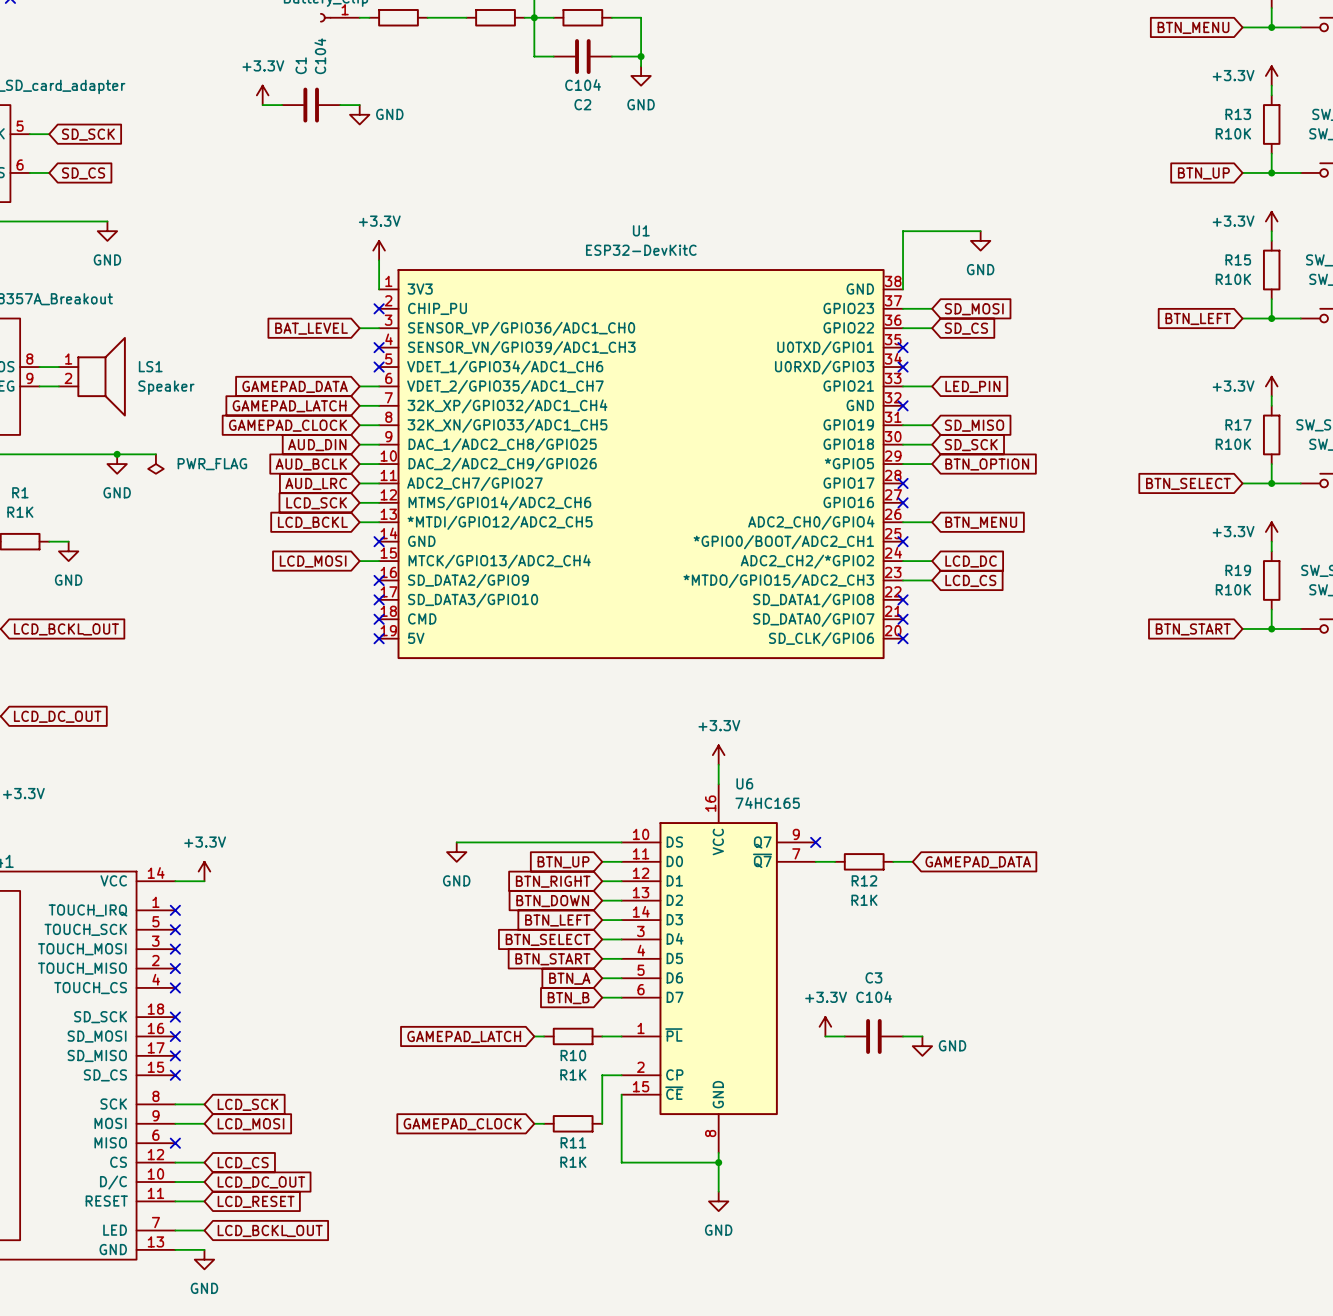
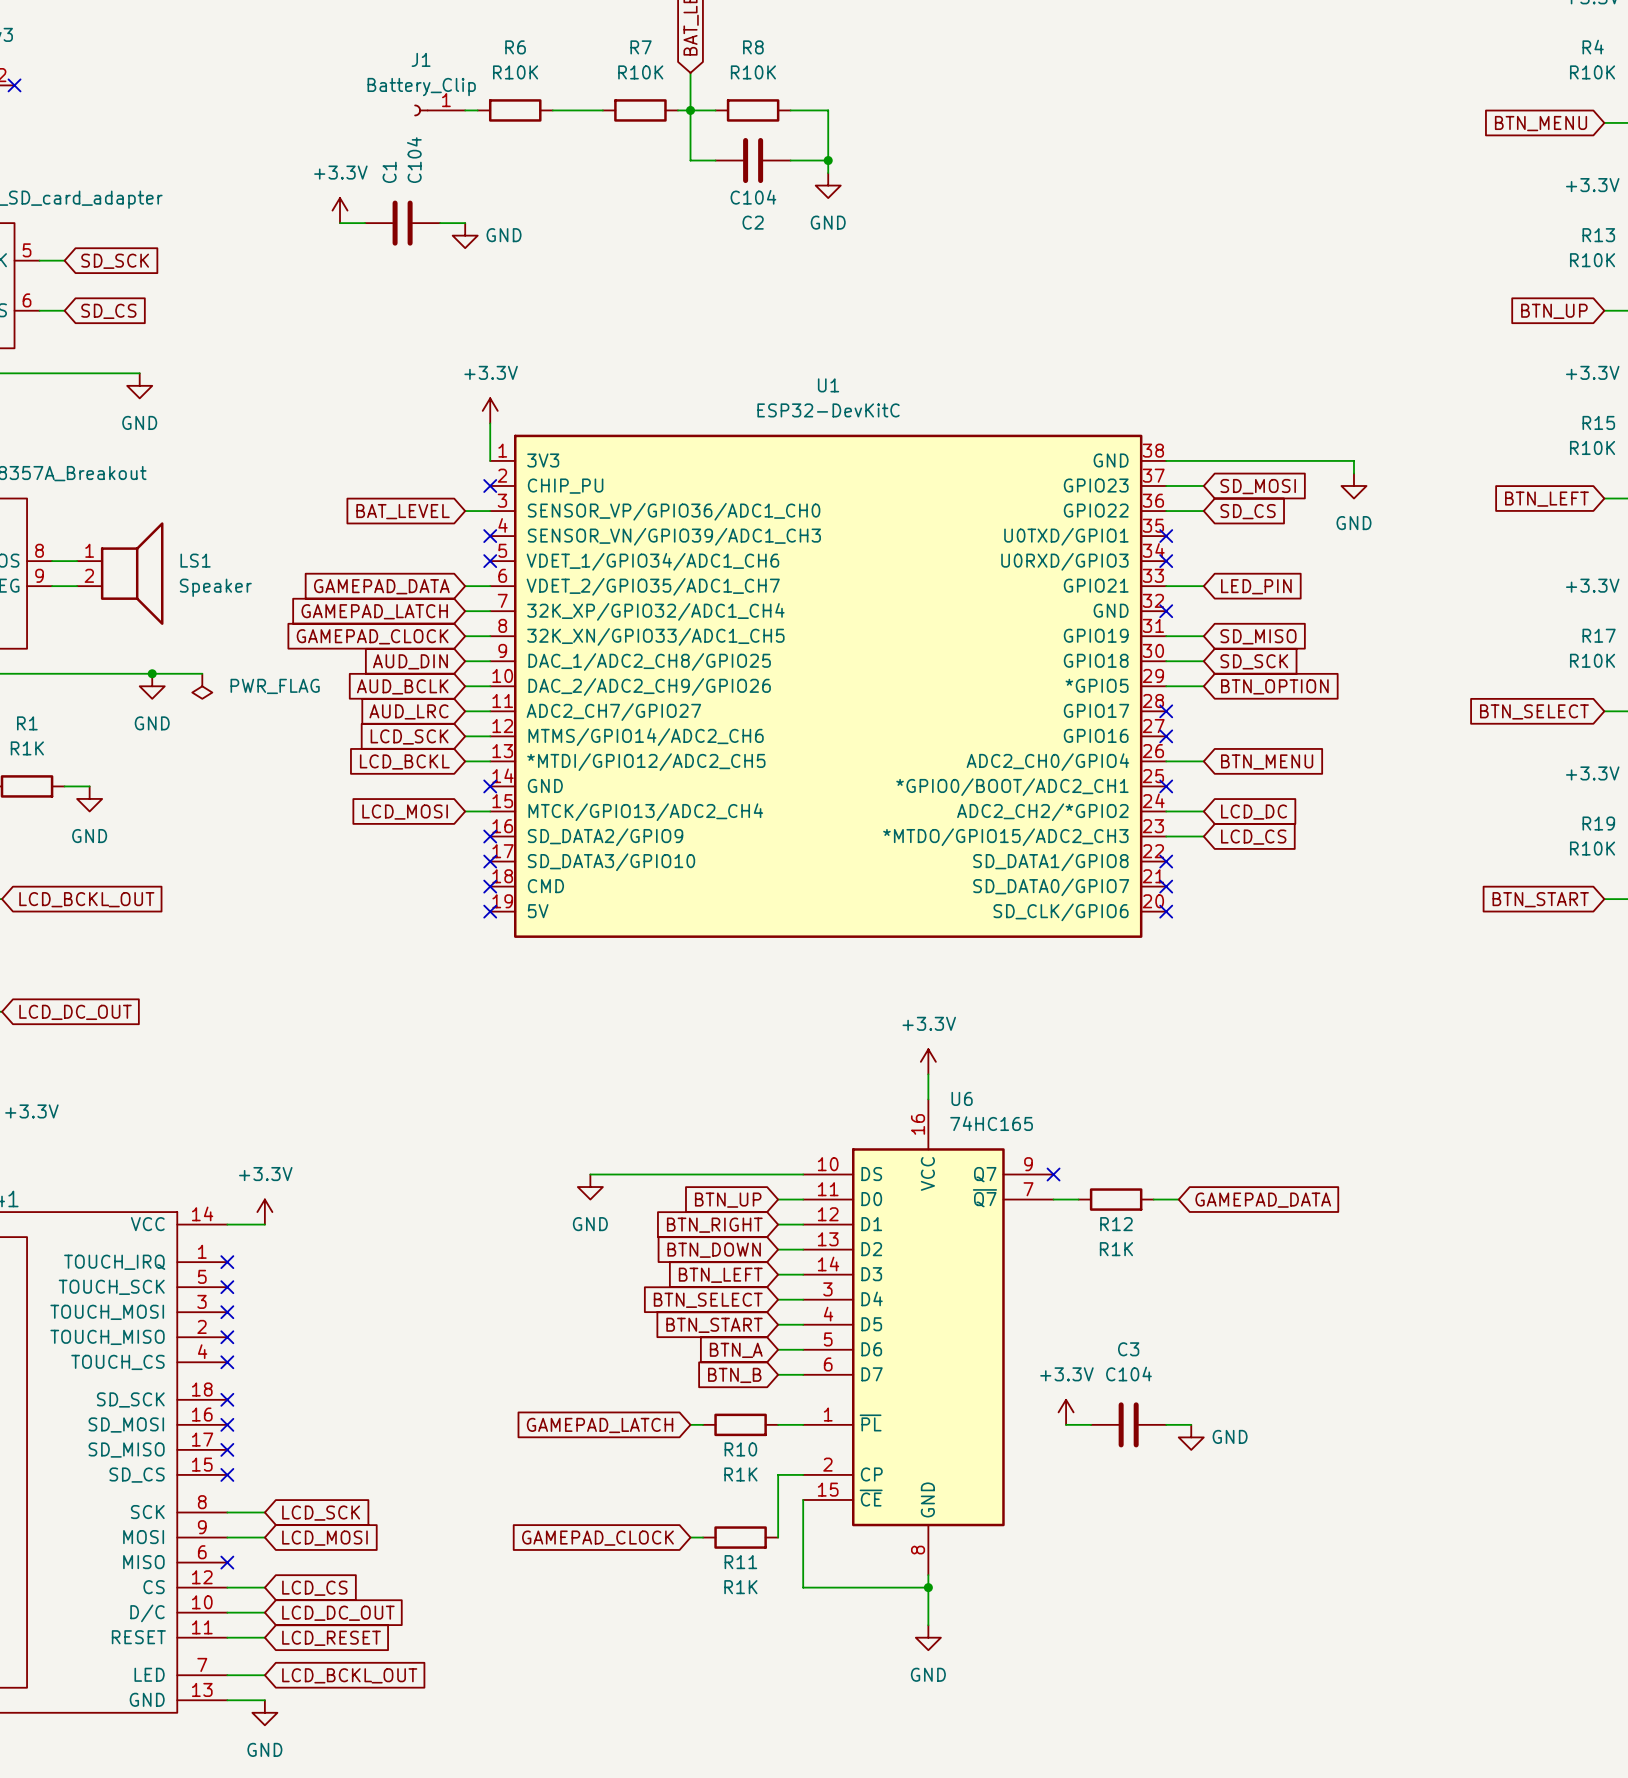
wire: (980, 231) (903, 231) (903, 289) -> (1353, 473) (1353, 460) (1166, 460)
power symbol position: GND (980, 240) -> GND (1353, 485)

